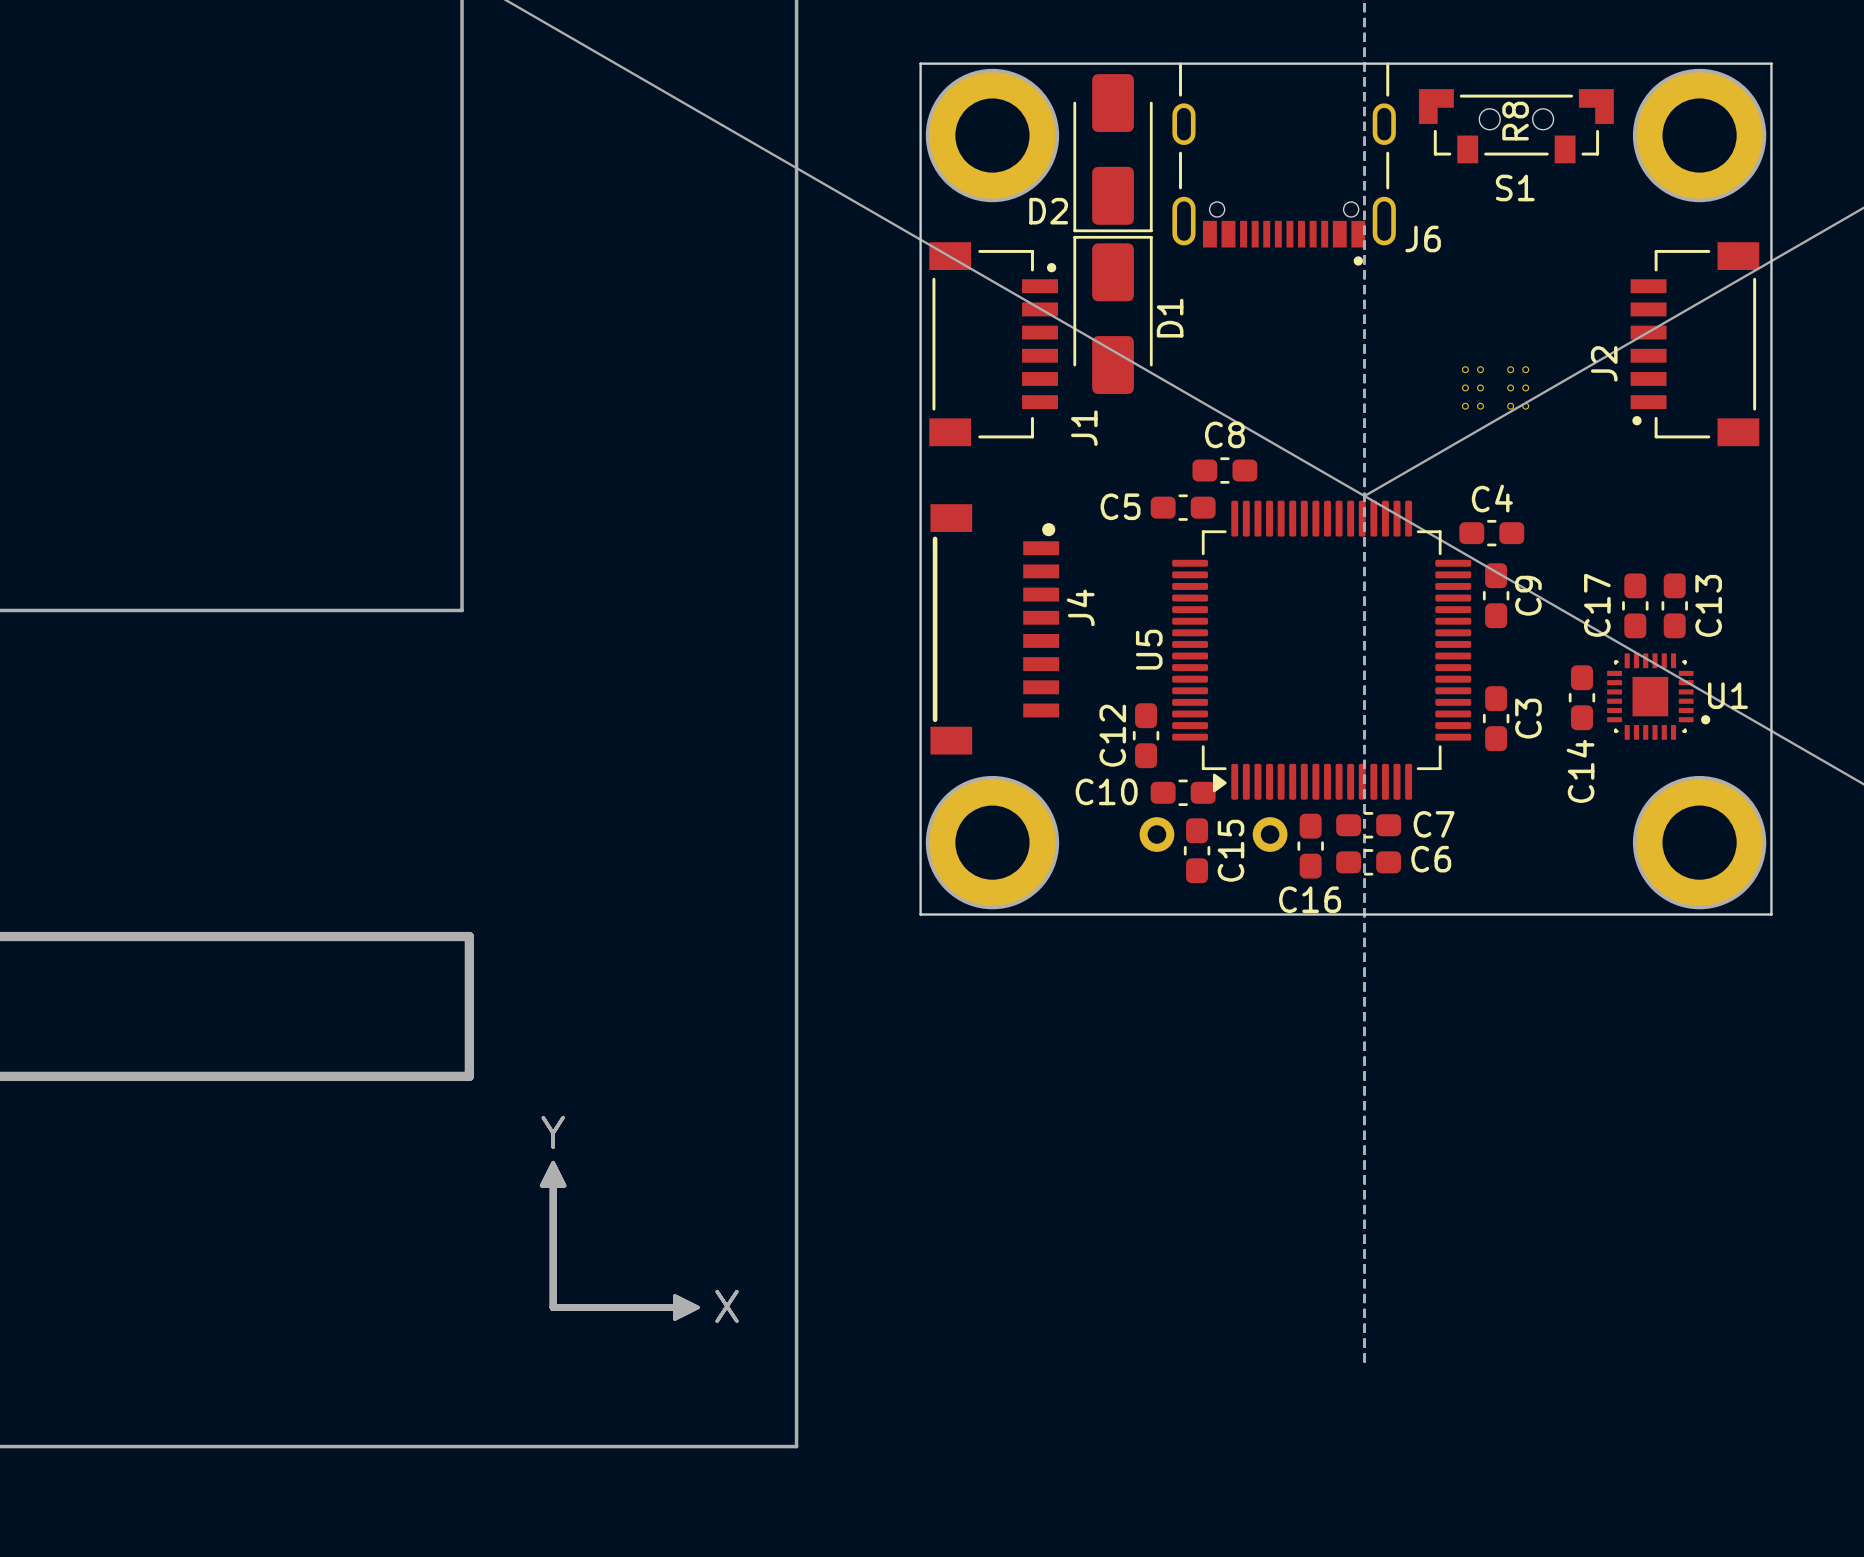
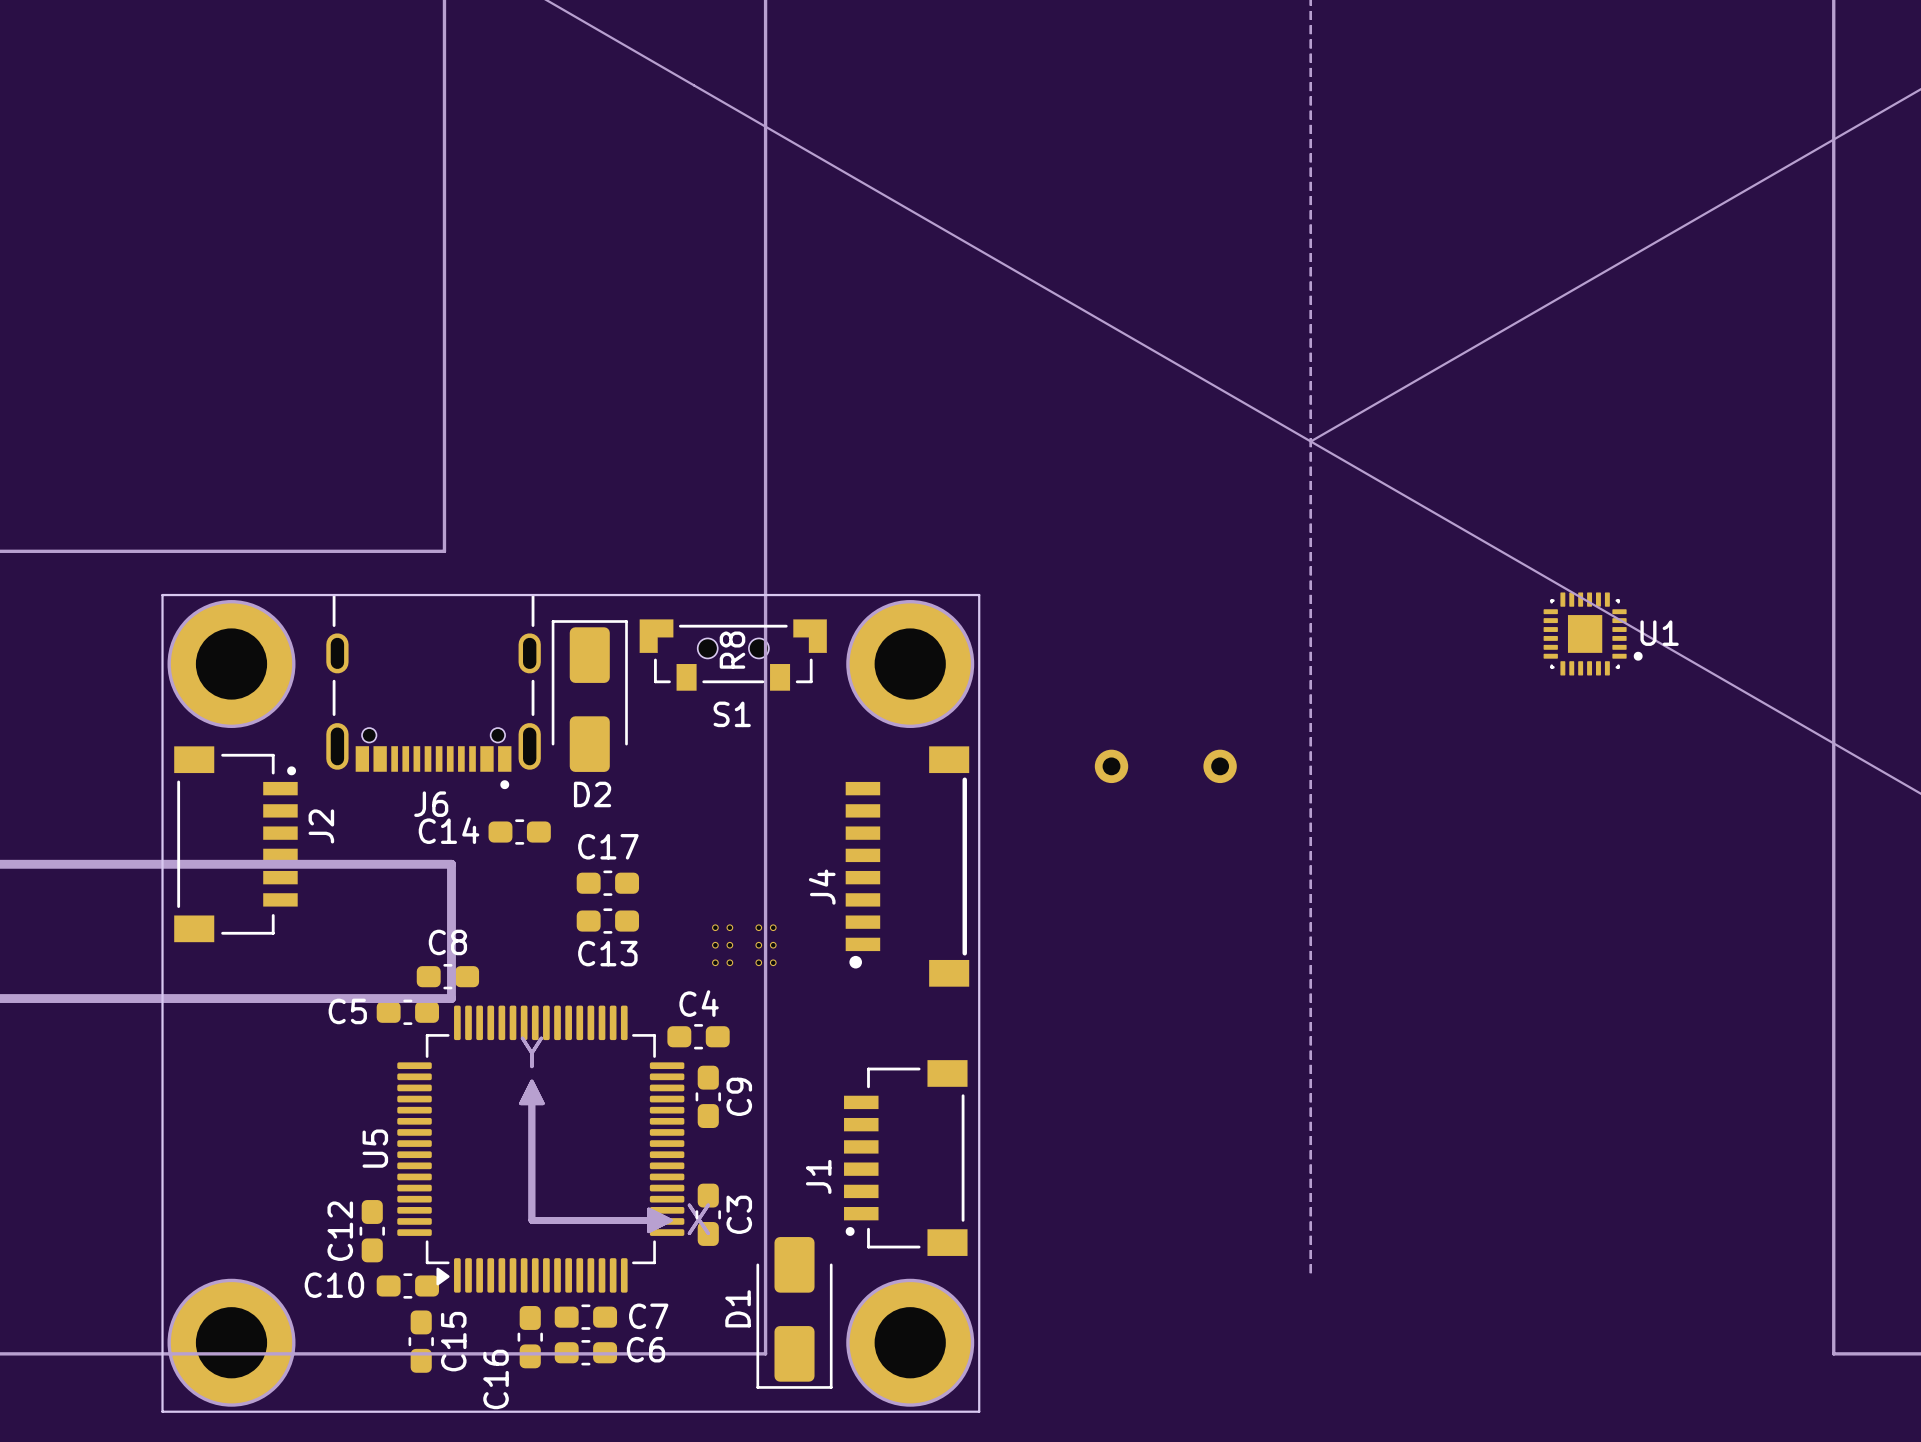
board edge: (920, 63) (1771, 63) (1771, 914) (920, 914) (920, 63) -> none
R8 position: (1515, 121) -> (732, 650)
S1 position: (1516, 126) -> (733, 655)
part: (992, 135) -> none
part: (1699, 135) -> none
D2 rotation: 0° (1113, 153) -> 180° (589, 696)
D2 position: (1113, 153) -> (589, 696)
J6 position: (1284, 164) -> (433, 691)
D2 name position: D2 (1048, 211) -> D2 (592, 794)
J6 name position: J6 (1423, 238) -> J6 (431, 804)
D1 rotation: 0° (1113, 314) -> 180° (794, 1312)
D1 position: (1113, 314) -> (794, 1312)
J1 rotation: 0° (993, 344) -> 180° (905, 1158)
J1 position: (993, 344) -> (905, 1158)
J2 rotation: 0° (1694, 344) -> 180° (235, 844)
J2 position: (1694, 344) -> (235, 844)
part: (1495, 387) -> none
J1 name position: J1 (1084, 428) -> J1 (818, 1176)
C8 position: (1224, 470) -> (447, 976)
C5 position: (1183, 507) -> (407, 1012)
C4 position: (1491, 533) -> (698, 1036)
C9 position: (1496, 595) -> (708, 1096)
C17 rotation: 0° (1635, 605) -> 90° clockwise (607, 883)
C17 position: (1635, 605) -> (607, 883)
C13 rotation: 0° (1674, 605) -> 90° clockwise (607, 921)
C13 position: (1674, 605) -> (607, 921)
J4 rotation: 0° (994, 629) -> 180° (907, 866)
J4 position: (994, 629) -> (907, 866)
U5 position: (1321, 650) -> (540, 1149)
board edge: none -> (162, 595) (979, 595) (979, 1411) (162, 1411) (162, 595)
C14 rotation: 0° (1581, 697) -> 90° clockwise (519, 832)
C14 position: (1581, 697) -> (519, 832)
C3 position: (1496, 718) -> (708, 1214)
part: none -> (231, 664)
C12 position: (1146, 735) -> (372, 1231)
C10 position: (1183, 792) -> (407, 1285)
C7 position: (1368, 825) -> (585, 1317)
part position: (992, 842) -> (910, 664)
part: (1699, 842) -> none
C16 position: (1310, 846) -> (530, 1337)
C15 position: (1197, 850) -> (421, 1341)
C6 position: (1368, 862) -> (585, 1352)
C16 name rotation: 0° (1310, 899) -> 90° counterclockwise (496, 1379)
part: none -> (744, 945)
part: none -> (231, 1342)
part: none -> (910, 1342)

